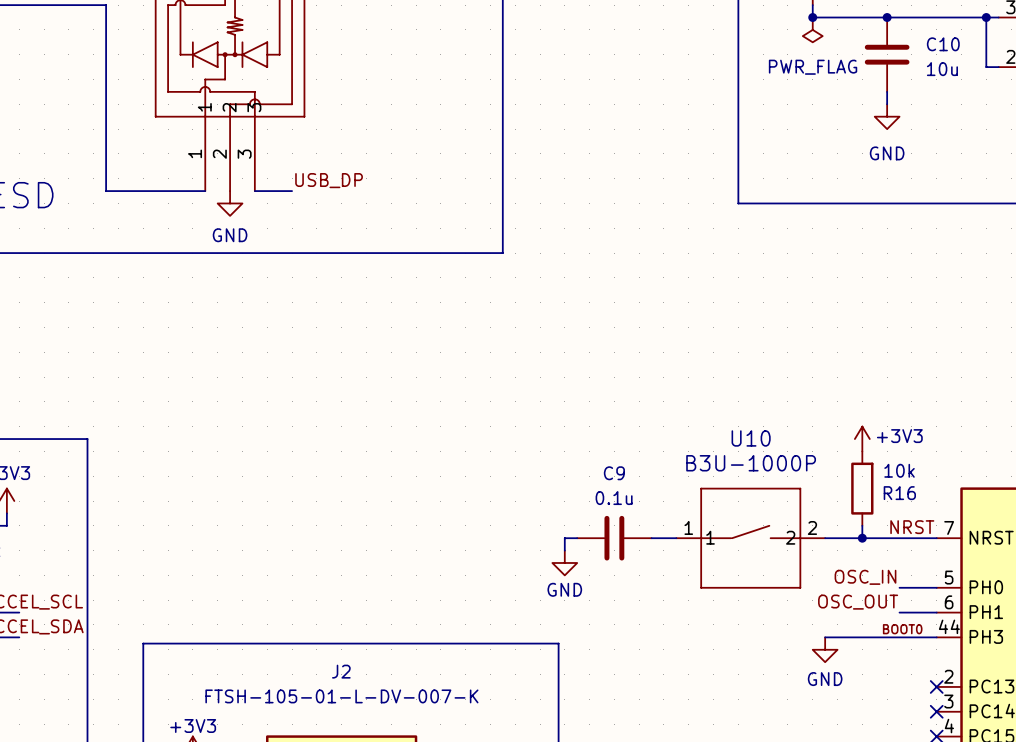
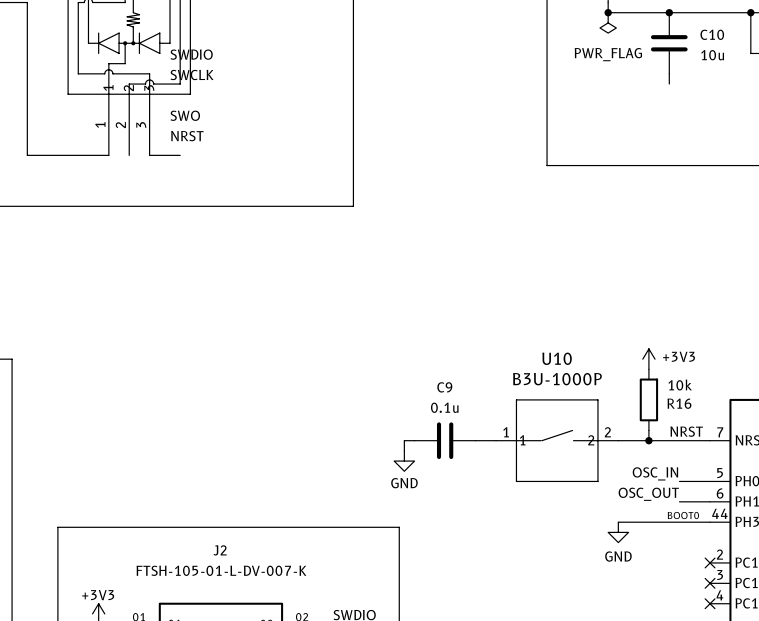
label: none -> SWDIO (191, 54)
label: none -> SWCLK (192, 75)
power symbol: GND (887, 116) -> none
label: none -> SWO (185, 115)
label: none -> NRST (187, 136)
label: USB_DP (329, 180) -> none
power symbol: GND (230, 203) -> none

